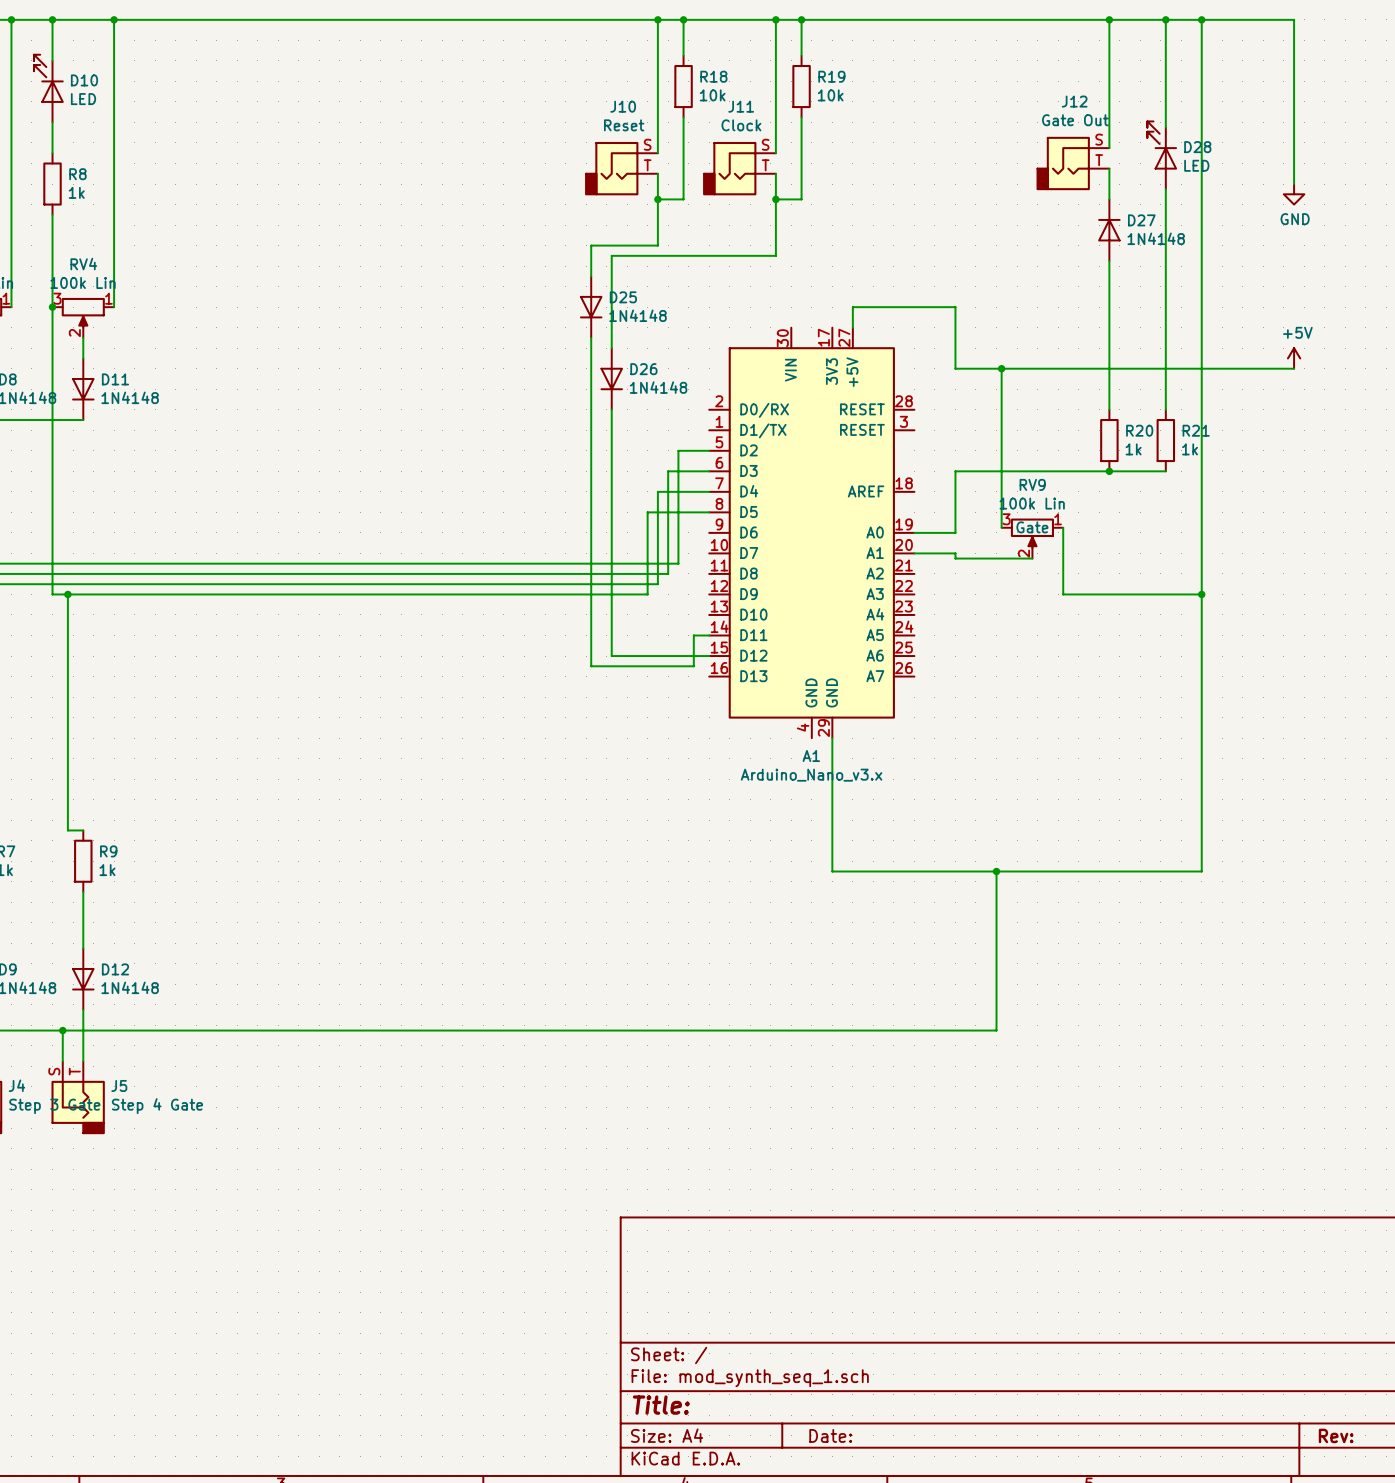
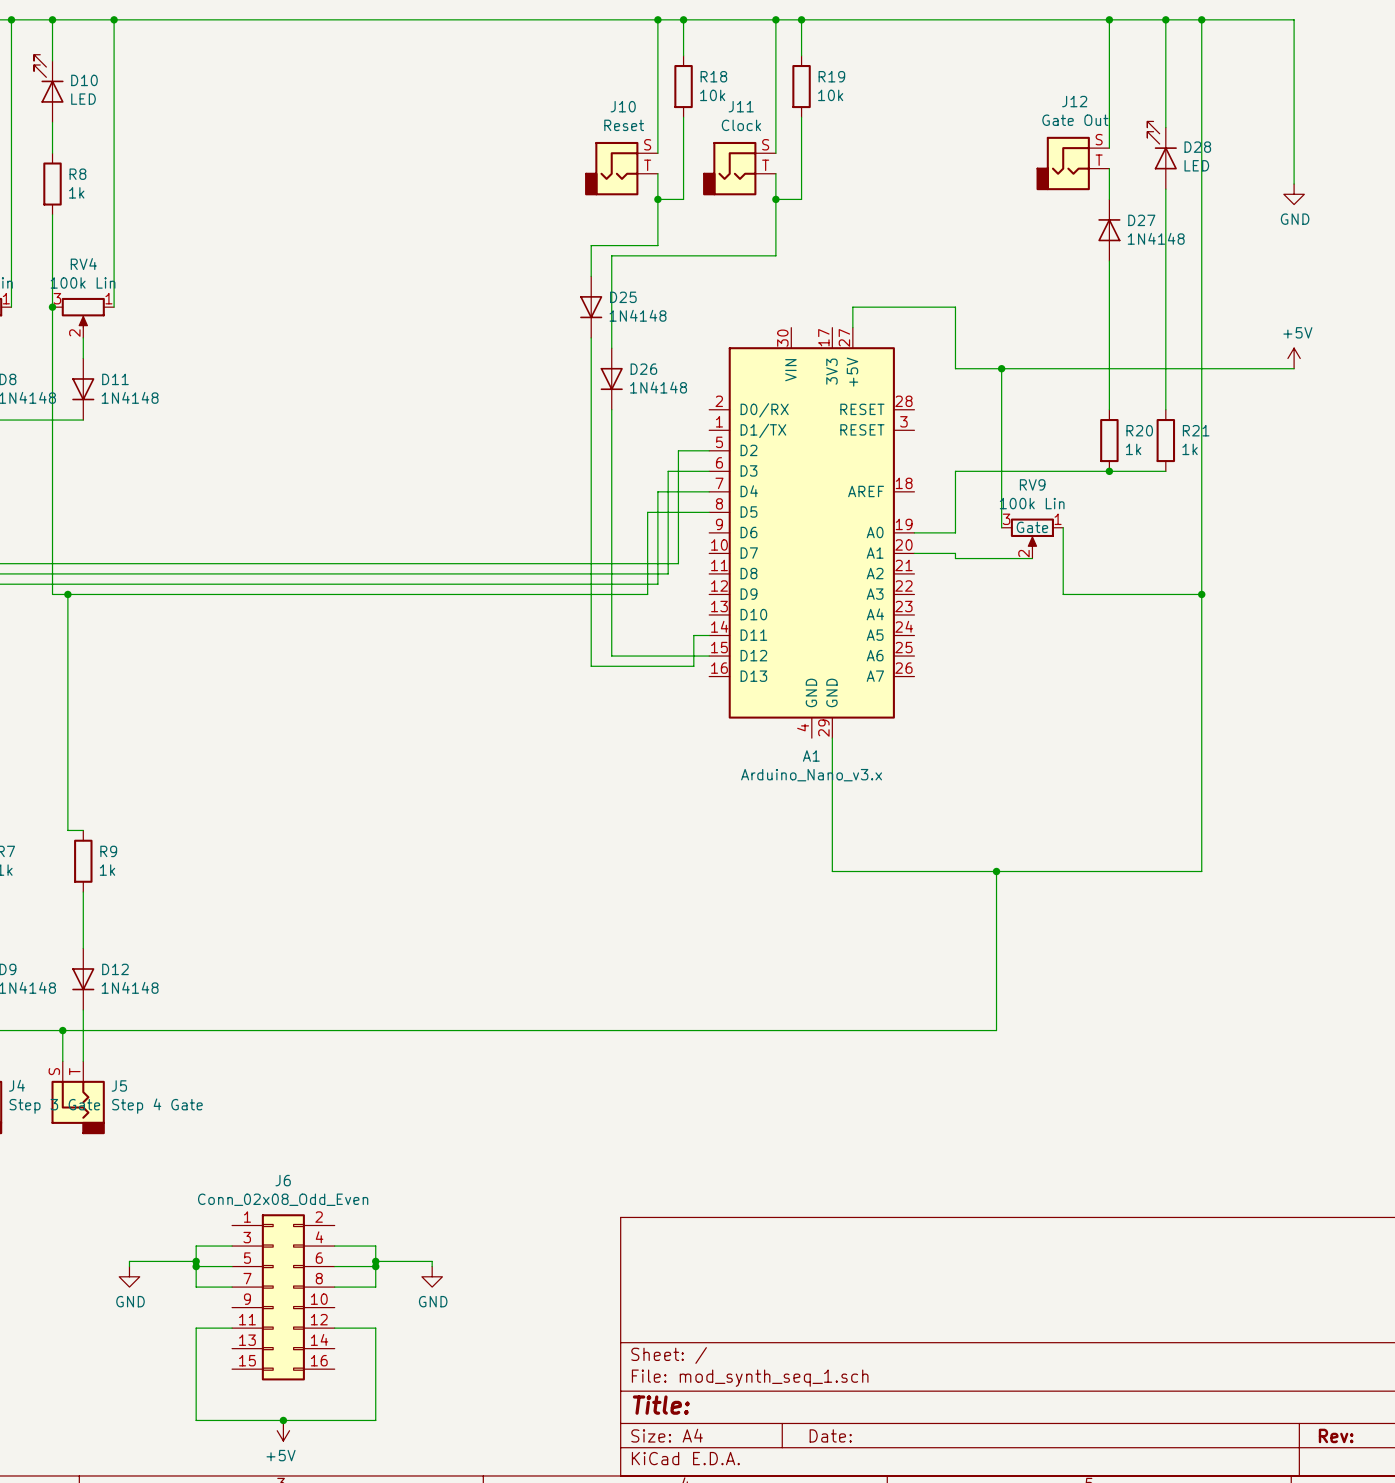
wire: none -> (232, 1246) (196, 1246) (196, 1287) (232, 1287)
wire: none -> (334, 1246) (375, 1246) (375, 1287) (334, 1287)
wire: none -> (196, 1261) (129, 1261) (129, 1266)
junction: none -> (196, 1261)
wire: none -> (375, 1261) (432, 1261) (432, 1266)
junction: none -> (375, 1261)
wire: none -> (196, 1266) (232, 1266)
junction: none -> (196, 1266)
wire: none -> (334, 1266) (375, 1266)
junction: none -> (375, 1266)
power symbol: none -> GND (129, 1276)
power symbol: none -> GND (432, 1276)
J6: none -> Conn_02x08_Odd_Even (283, 1297)
wire: none -> (232, 1328) (196, 1328) (196, 1420) (375, 1420) (375, 1328) (334, 1328)
junction: none -> (283, 1420)
power symbol: none -> +5V (283, 1430)

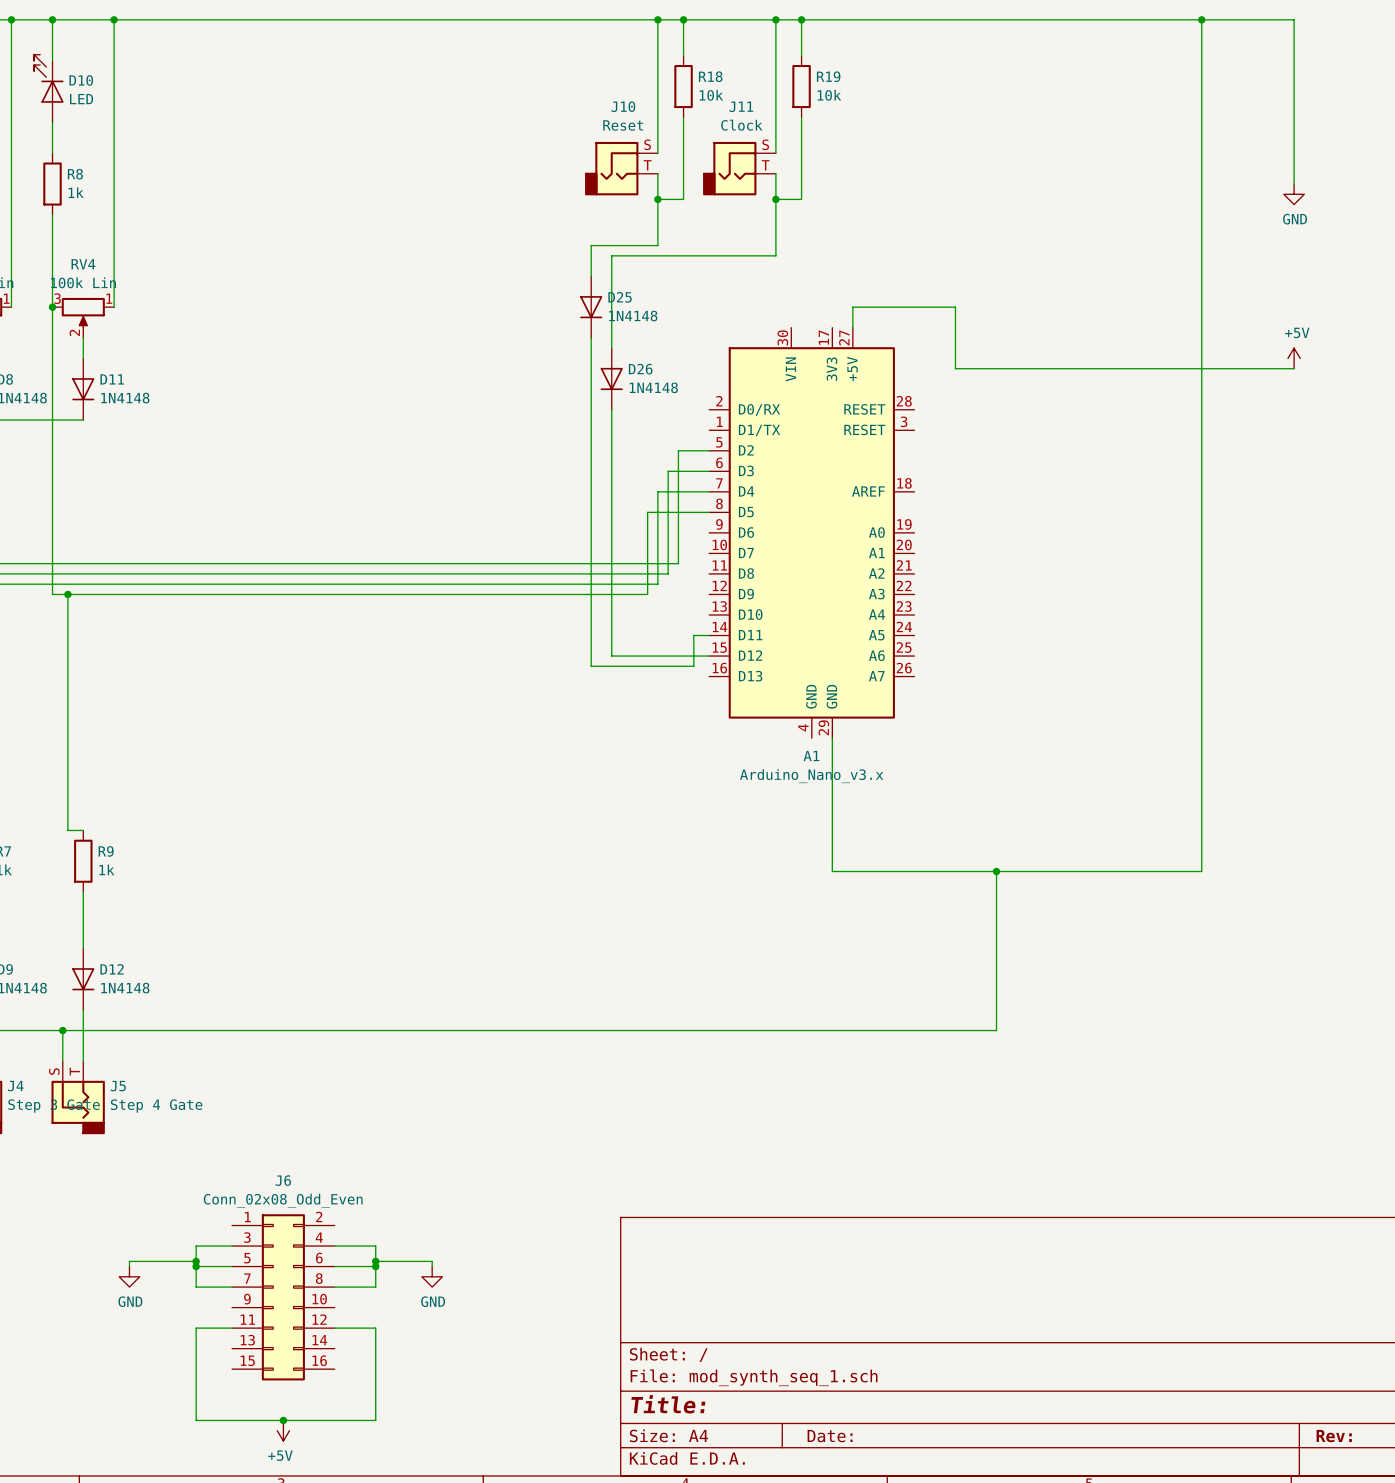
wire: (1109, 19) (1109, 148) -> none
junction: (1109, 19) -> none
wire: (1165, 19) (1165, 127) -> none
junction: (1165, 19) -> none
D28: LED (1162, 155) -> none
J12: Gate Out (1072, 163) -> none
wire: (1109, 168) (1109, 199) -> none
wire: (1165, 189) (1165, 409) -> none
D27: 1N4148 (1109, 230) -> none
wire: (1109, 260) (1109, 409) -> none
wire: (1001, 368) (1001, 527) -> none
junction: (1001, 368) -> none
R20: 1k (1109, 440) -> none
R21: 1k (1165, 440) -> none
junction: (1109, 471) -> none
wire: (1165, 471) (955, 471) (955, 532) (914, 532) -> none
wire: (1063, 527) (1063, 594) (1201, 594) -> none
RV9: 100k Lin (1032, 538) -> none
wire: (914, 553) (955, 553) (955, 558) (1032, 558) -> none
junction: (1201, 594) -> none

